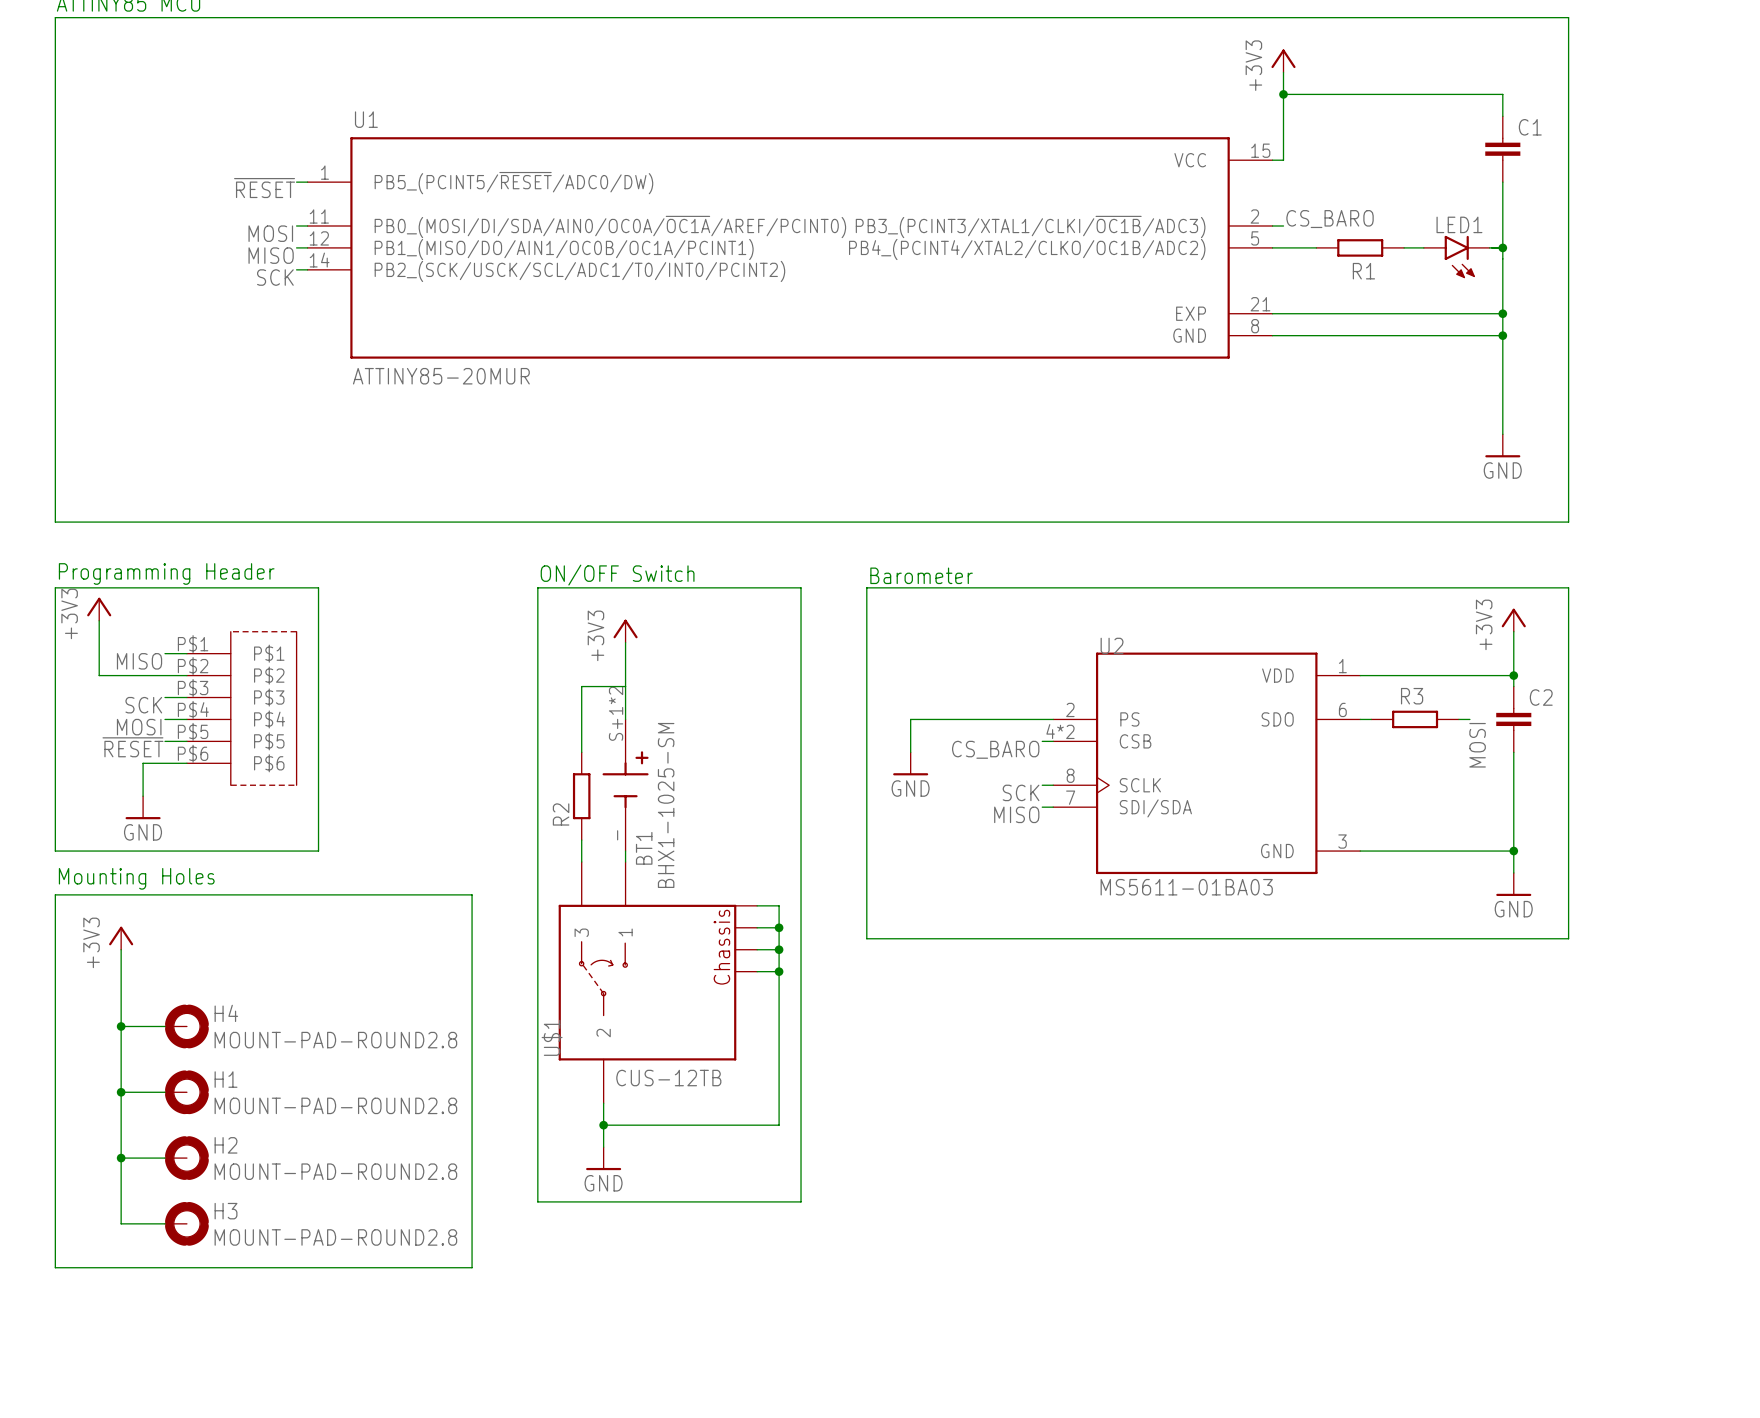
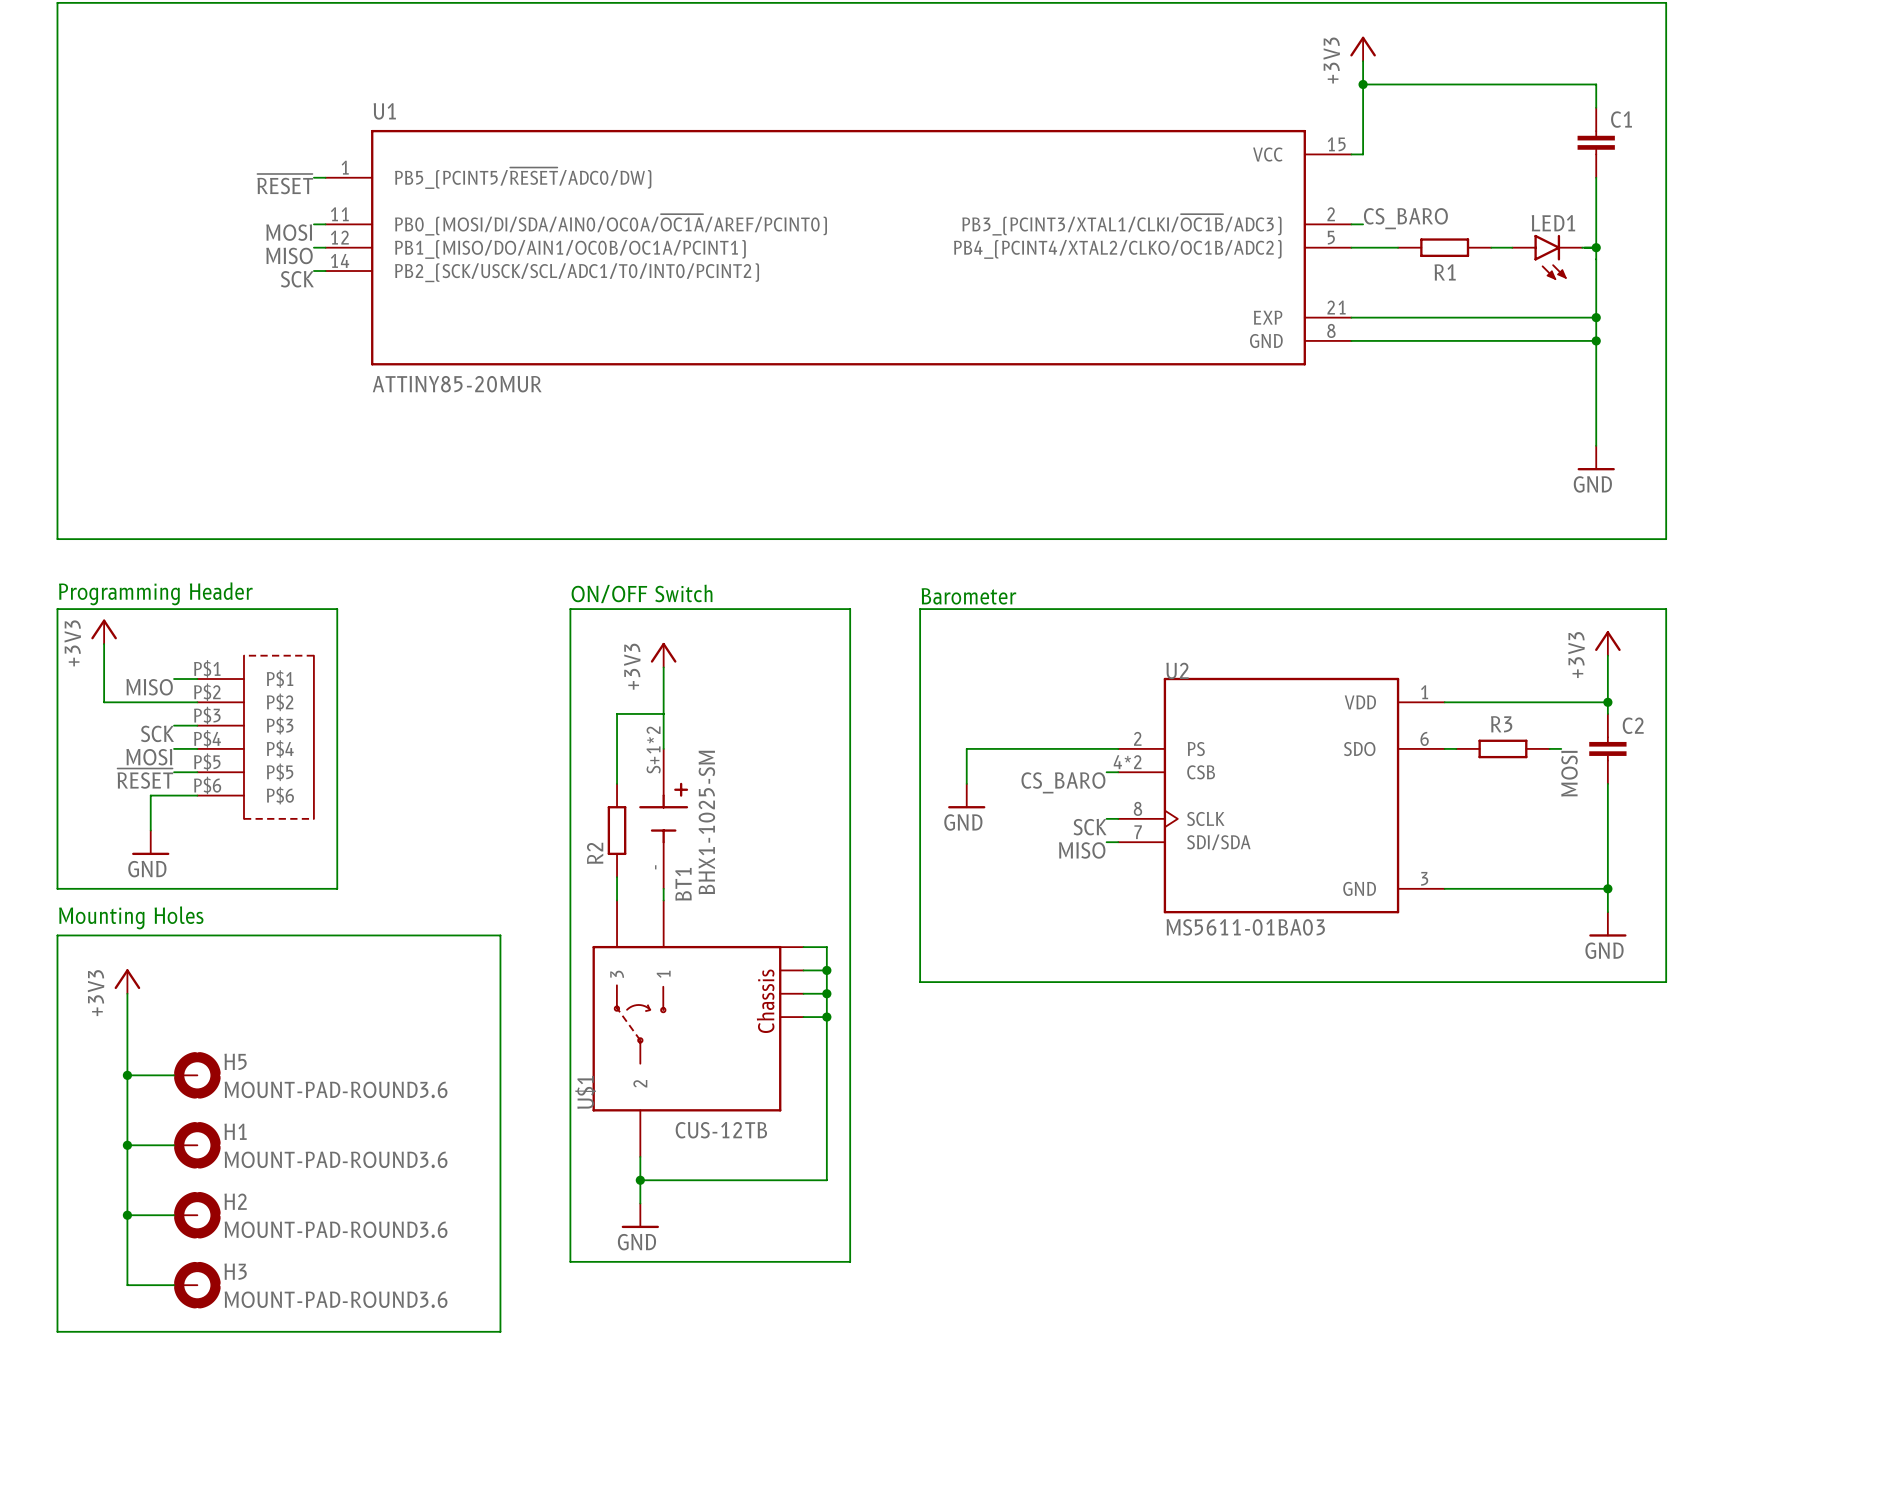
H4 name: H4 (226, 1013) -> H5 (235, 1061)
H4 value: MOUNT-PAD-ROUND2.8 (335, 1040) -> MOUNT-PAD-ROUND3.6 (336, 1089)
H1 value: MOUNT-PAD-ROUND2.8 (335, 1105) -> MOUNT-PAD-ROUND3.6 (336, 1159)
H2 value: MOUNT-PAD-ROUND2.8 (335, 1171) -> MOUNT-PAD-ROUND3.6 (336, 1229)
H3 value: MOUNT-PAD-ROUND2.8 (335, 1237) -> MOUNT-PAD-ROUND3.6 (336, 1299)

